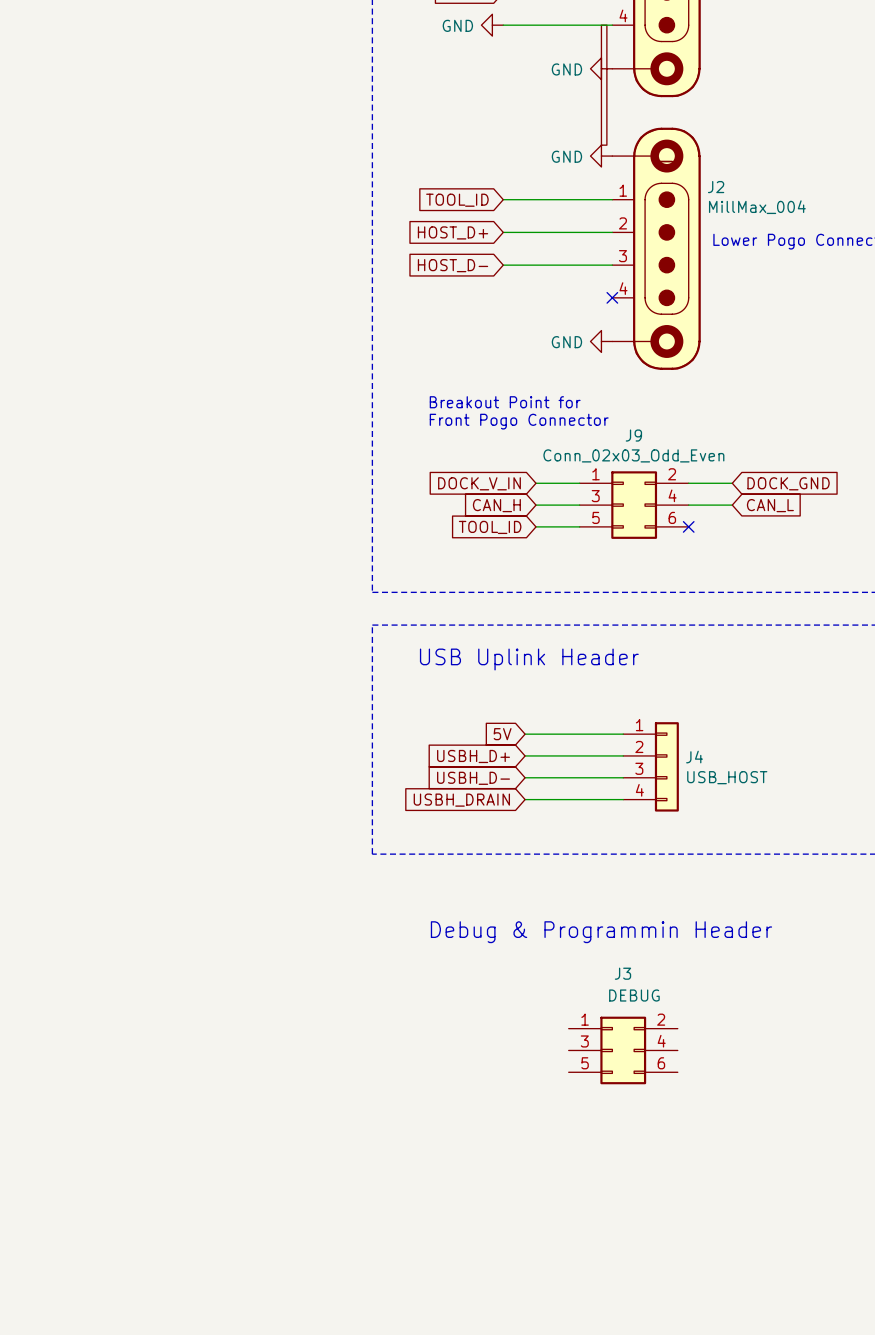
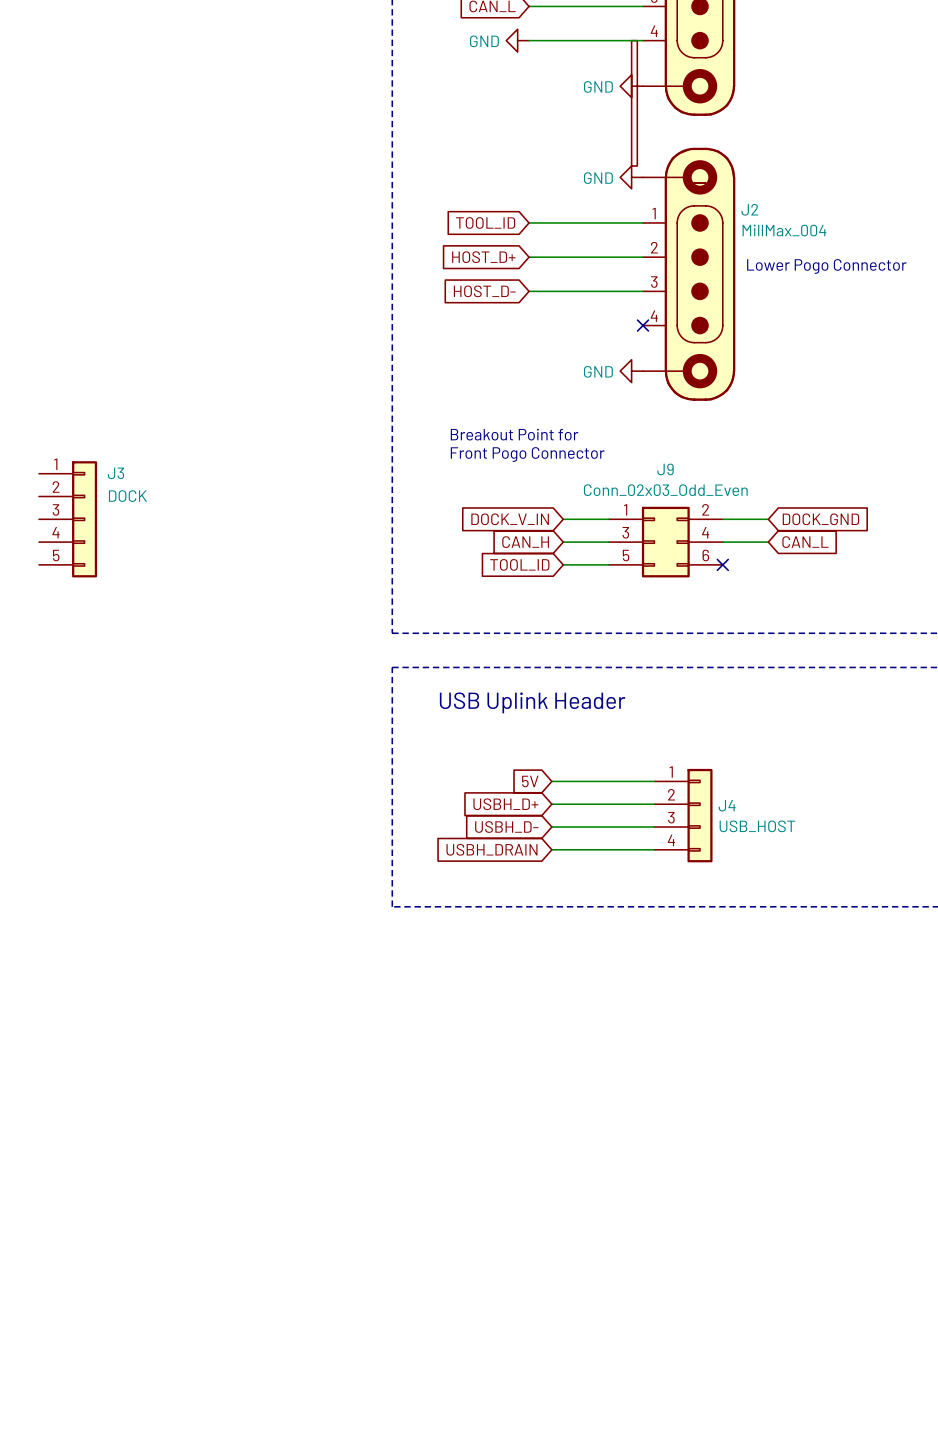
text: Debug & Programmin Header (601, 932) -> none
J3 name position: J3 (622, 973) -> J3 (115, 473)
J3 value: DEBUG (634, 995) -> DOCK (127, 496)
J3 symbol: [568, 1016, 678, 1085] -> [38, 461, 98, 578]

